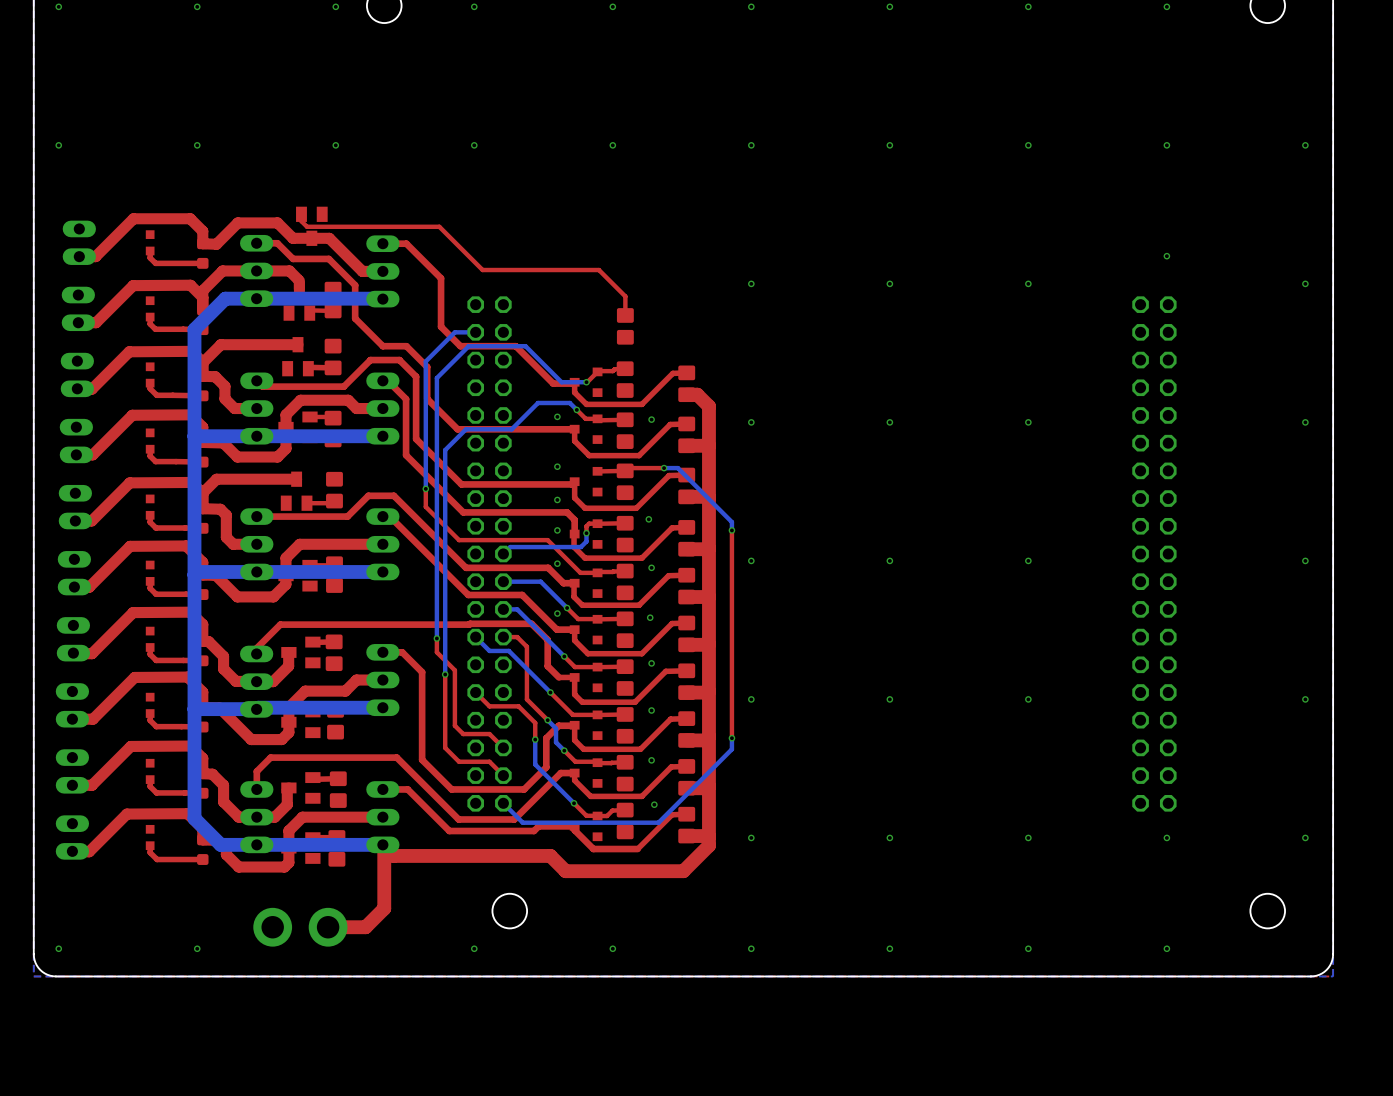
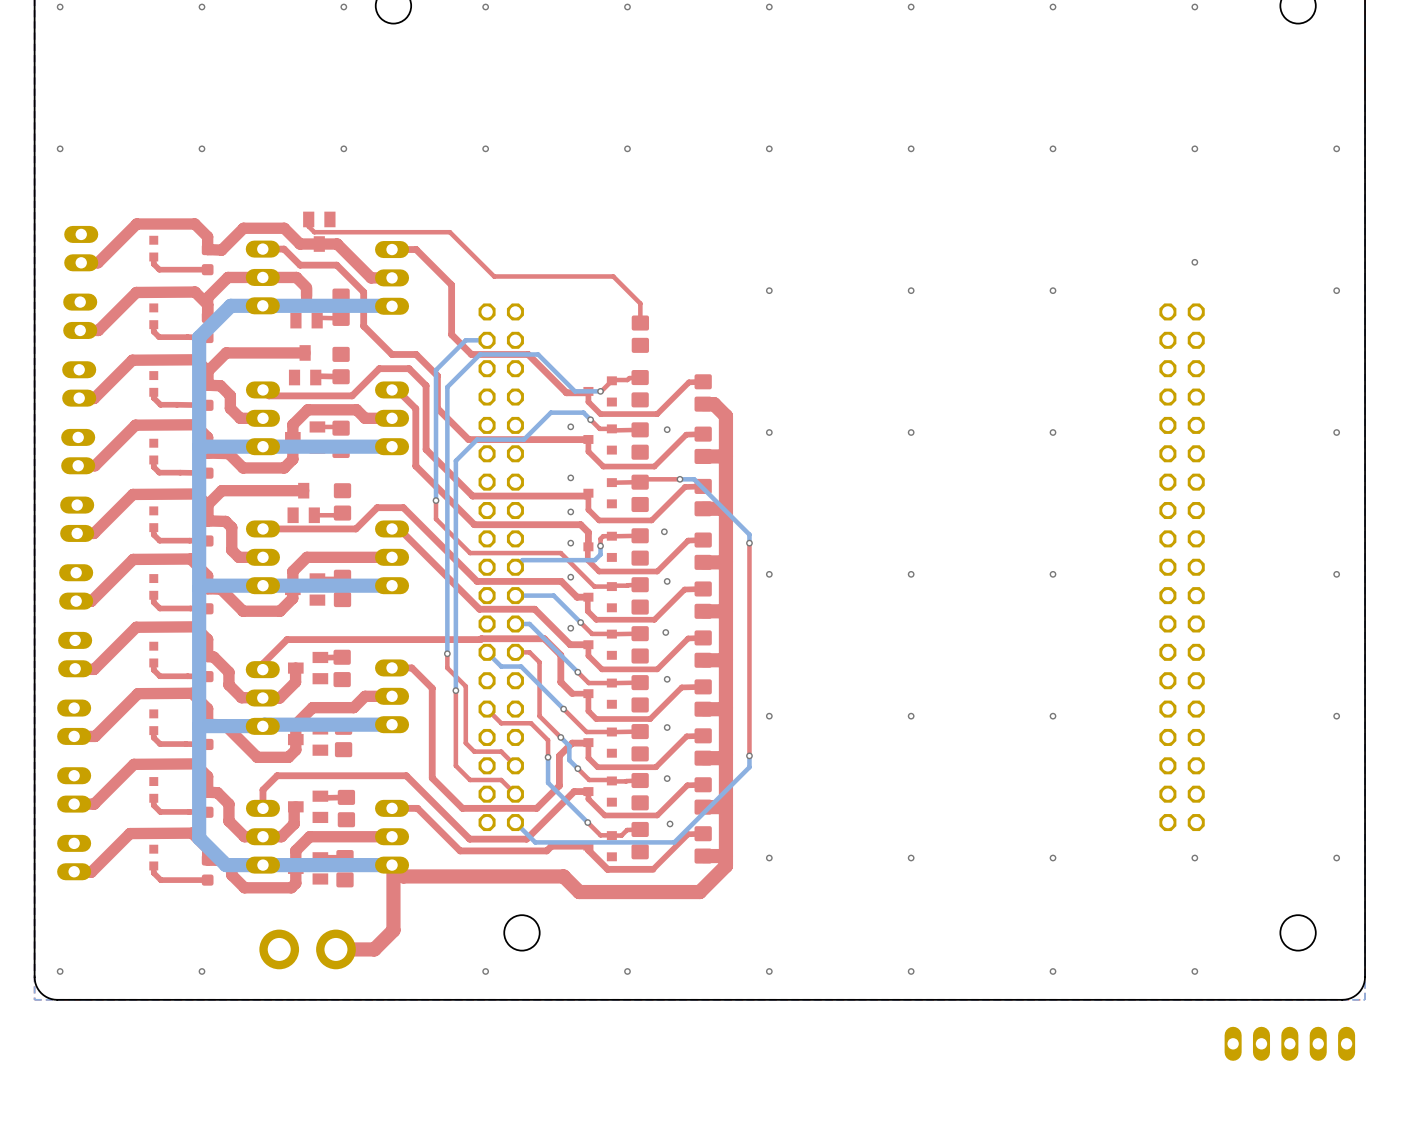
part: none -> (1289, 1043)

